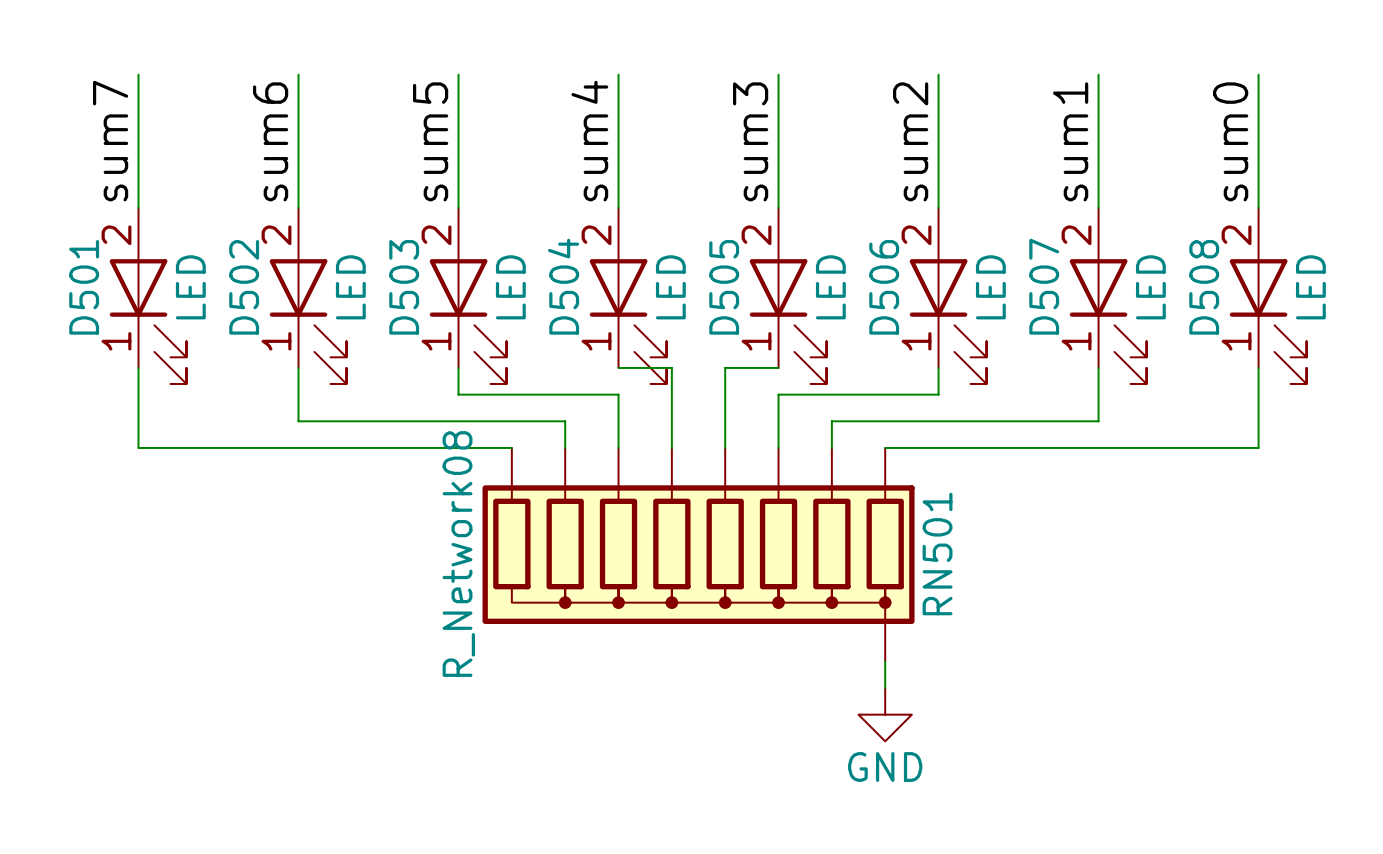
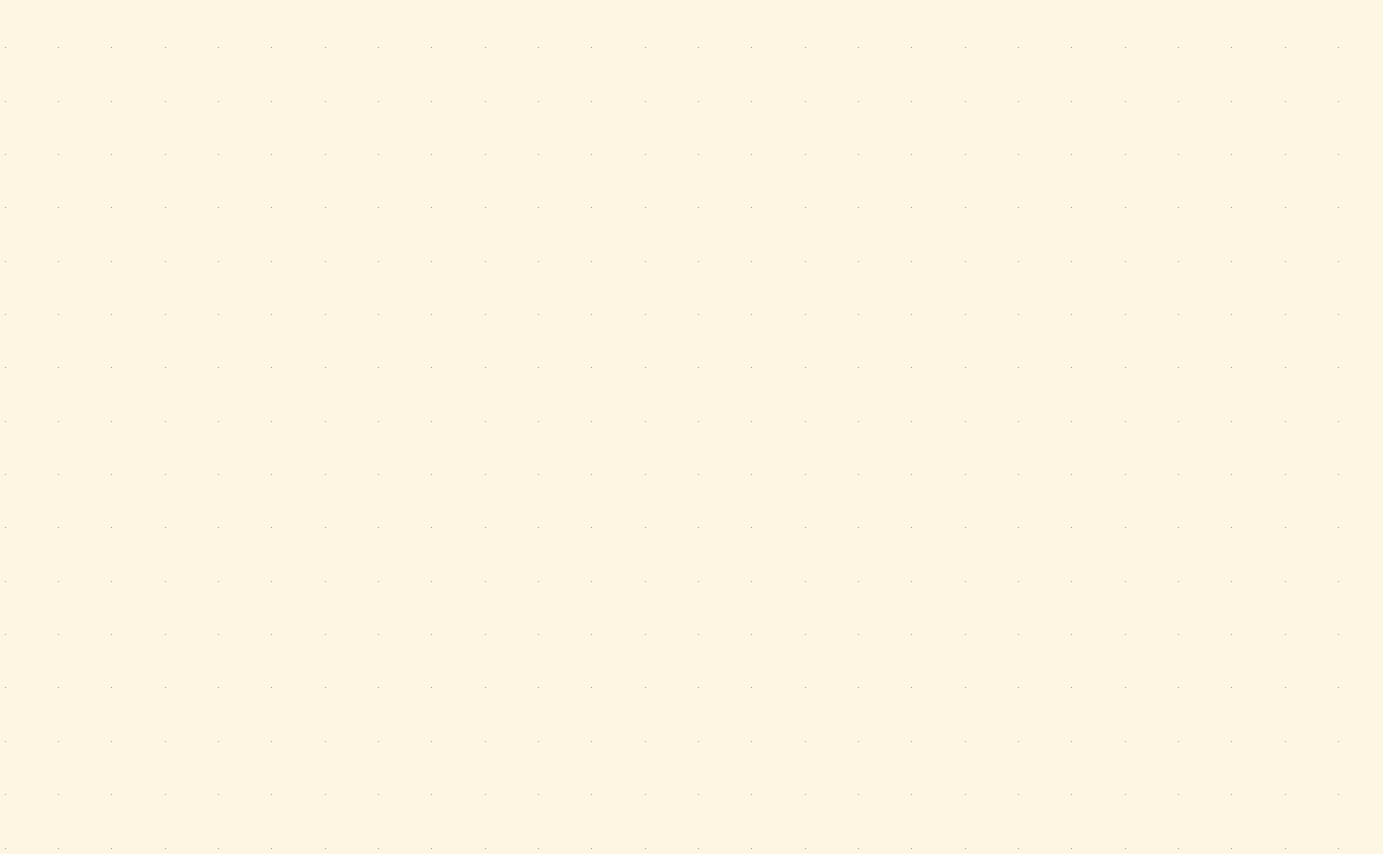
wire: (138, 74) (138, 207) -> none
wire: (298, 74) (298, 207) -> none
wire: (458, 74) (458, 207) -> none
wire: (618, 74) (618, 207) -> none
wire: (778, 74) (778, 207) -> none
wire: (938, 74) (938, 207) -> none
wire: (1098, 74) (1098, 207) -> none
wire: (1258, 74) (1258, 207) -> none
label: sum7 (110, 141) -> none
label: sum6 (270, 141) -> none
label: sum5 (430, 141) -> none
label: sum4 (589, 141) -> none
label: sum3 (750, 141) -> none
label: sum2 (910, 141) -> none
label: sum1 (1070, 141) -> none
label: sum0 (1230, 141) -> none
D501: LED (148, 295) -> none
D502: LED (308, 295) -> none
D503: LED (468, 295) -> none
D504: LED (628, 295) -> none
D505: LED (788, 295) -> none
D506: LED (948, 295) -> none
D507: LED (1108, 295) -> none
D508: LED (1268, 295) -> none
wire: (138, 367) (138, 447) (511, 447) -> none
wire: (298, 367) (298, 421) (565, 421) (565, 447) -> none
wire: (458, 367) (458, 394) (618, 394) (618, 447) -> none
wire: (618, 367) (671, 367) (671, 447) -> none
wire: (778, 367) (725, 367) (725, 447) -> none
wire: (938, 367) (938, 394) (778, 394) (778, 447) -> none
wire: (1098, 367) (1098, 421) (831, 421) (831, 447) -> none
wire: (1258, 367) (1258, 447) (885, 447) -> none
RN501: R_Network08 (698, 554) -> none
wire: (885, 661) (885, 687) -> none
power symbol: GND (885, 714) -> none

